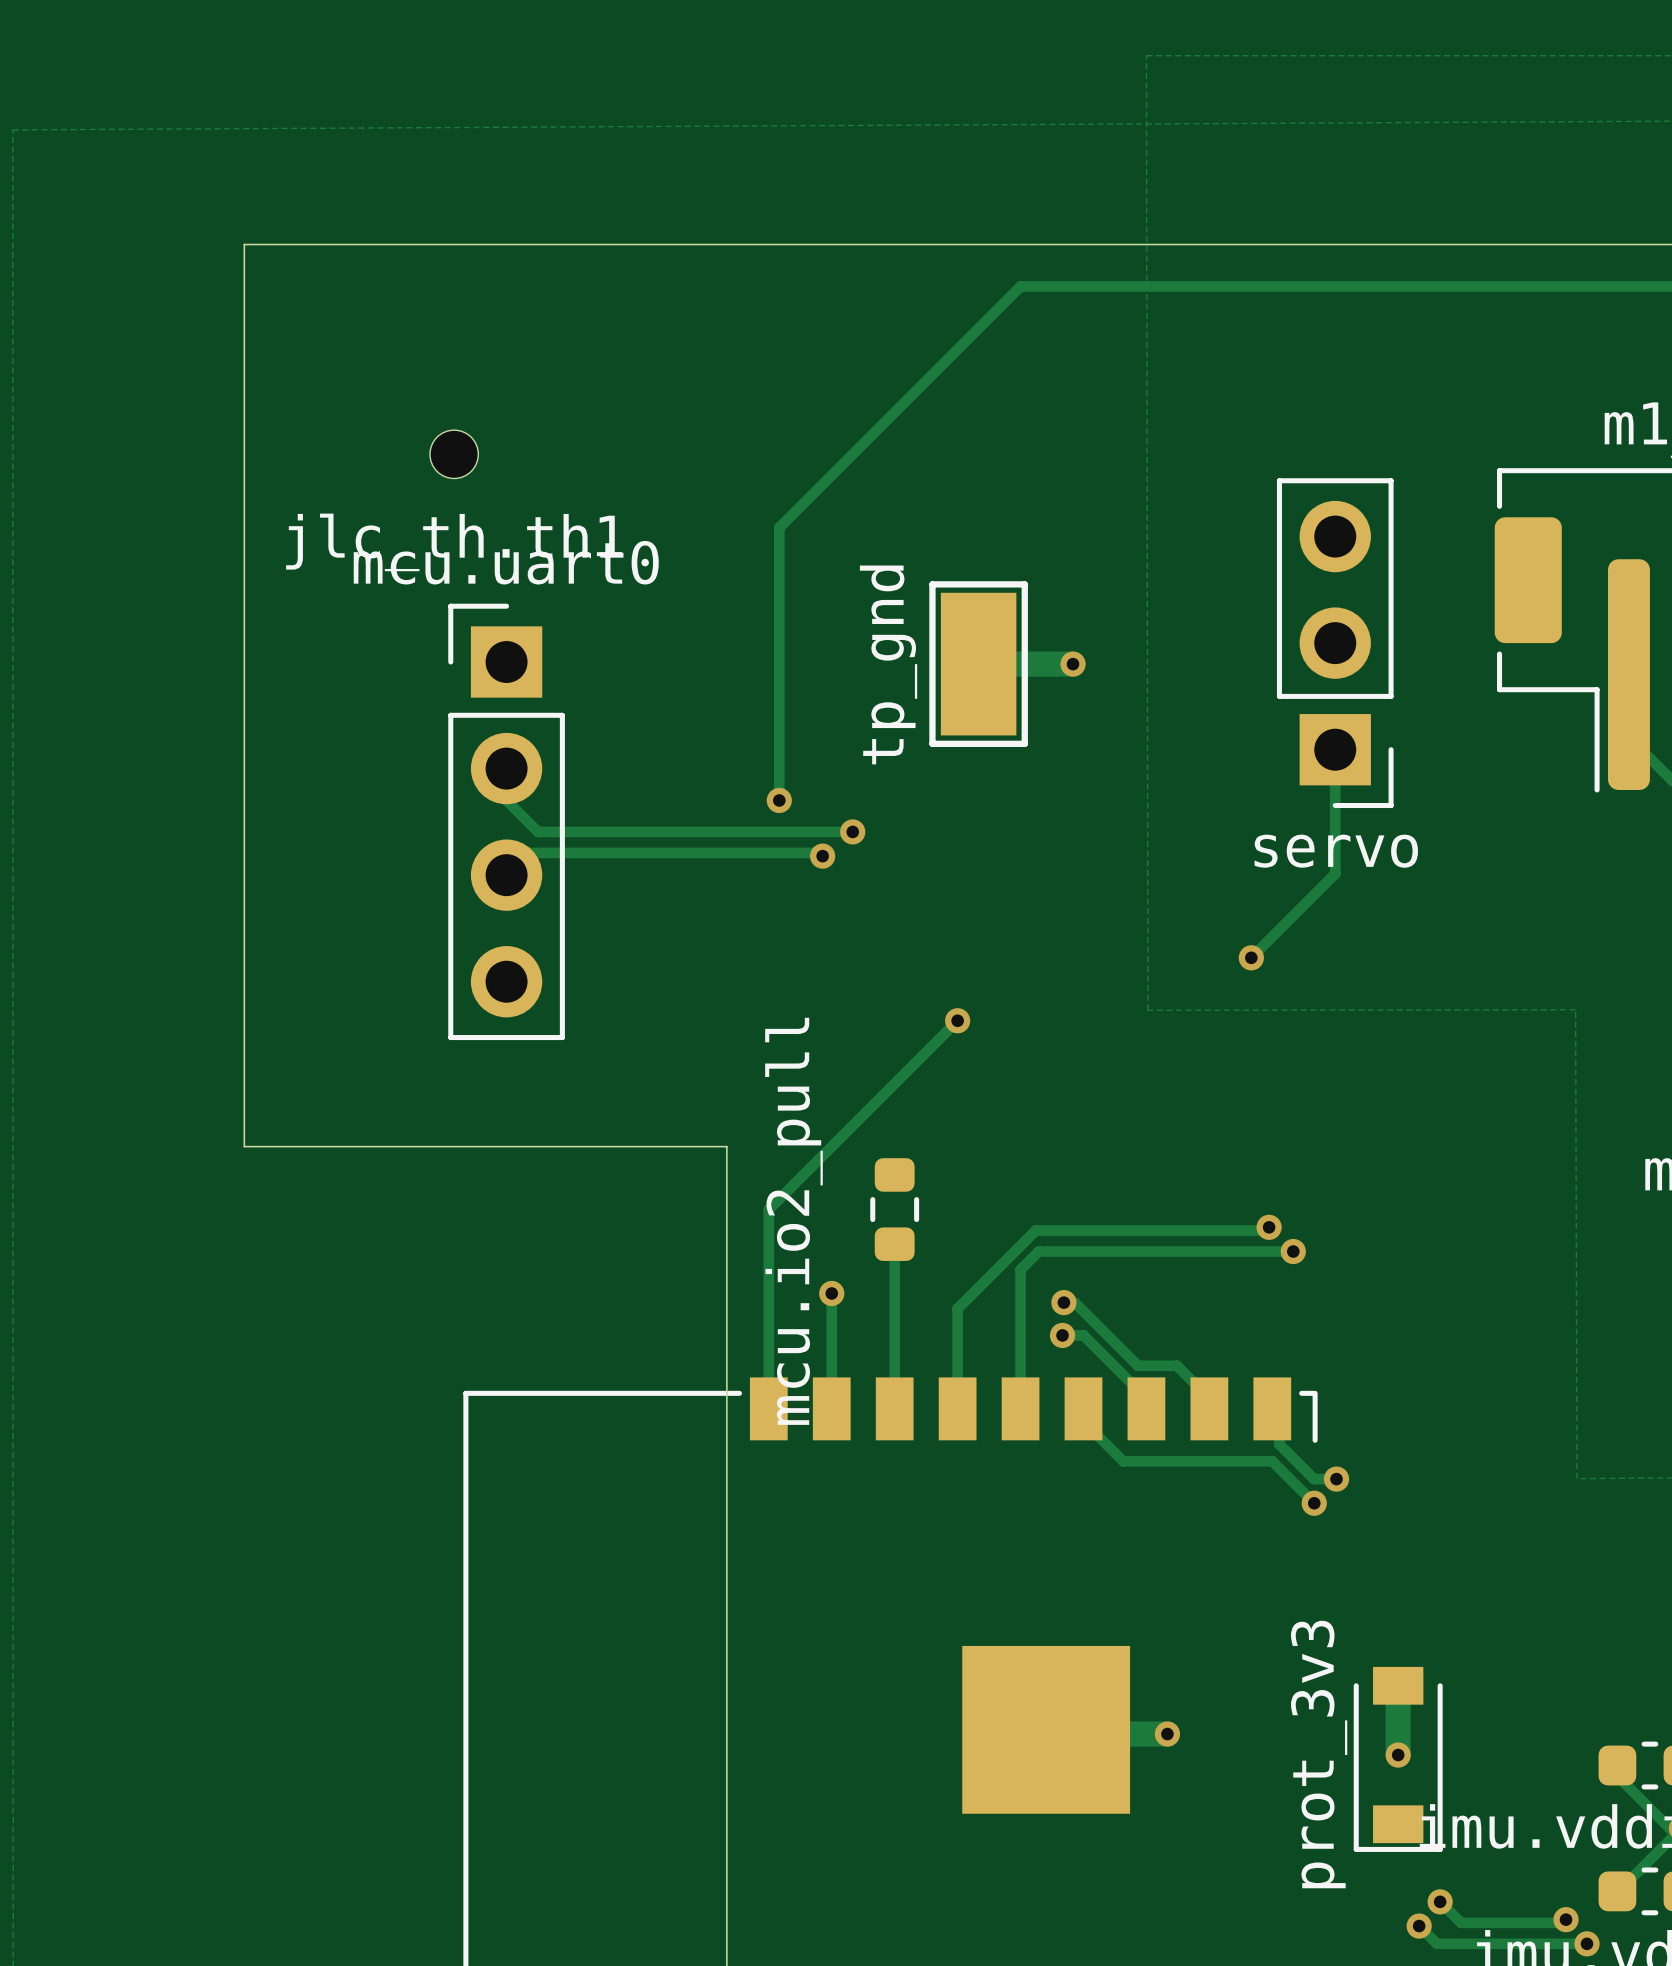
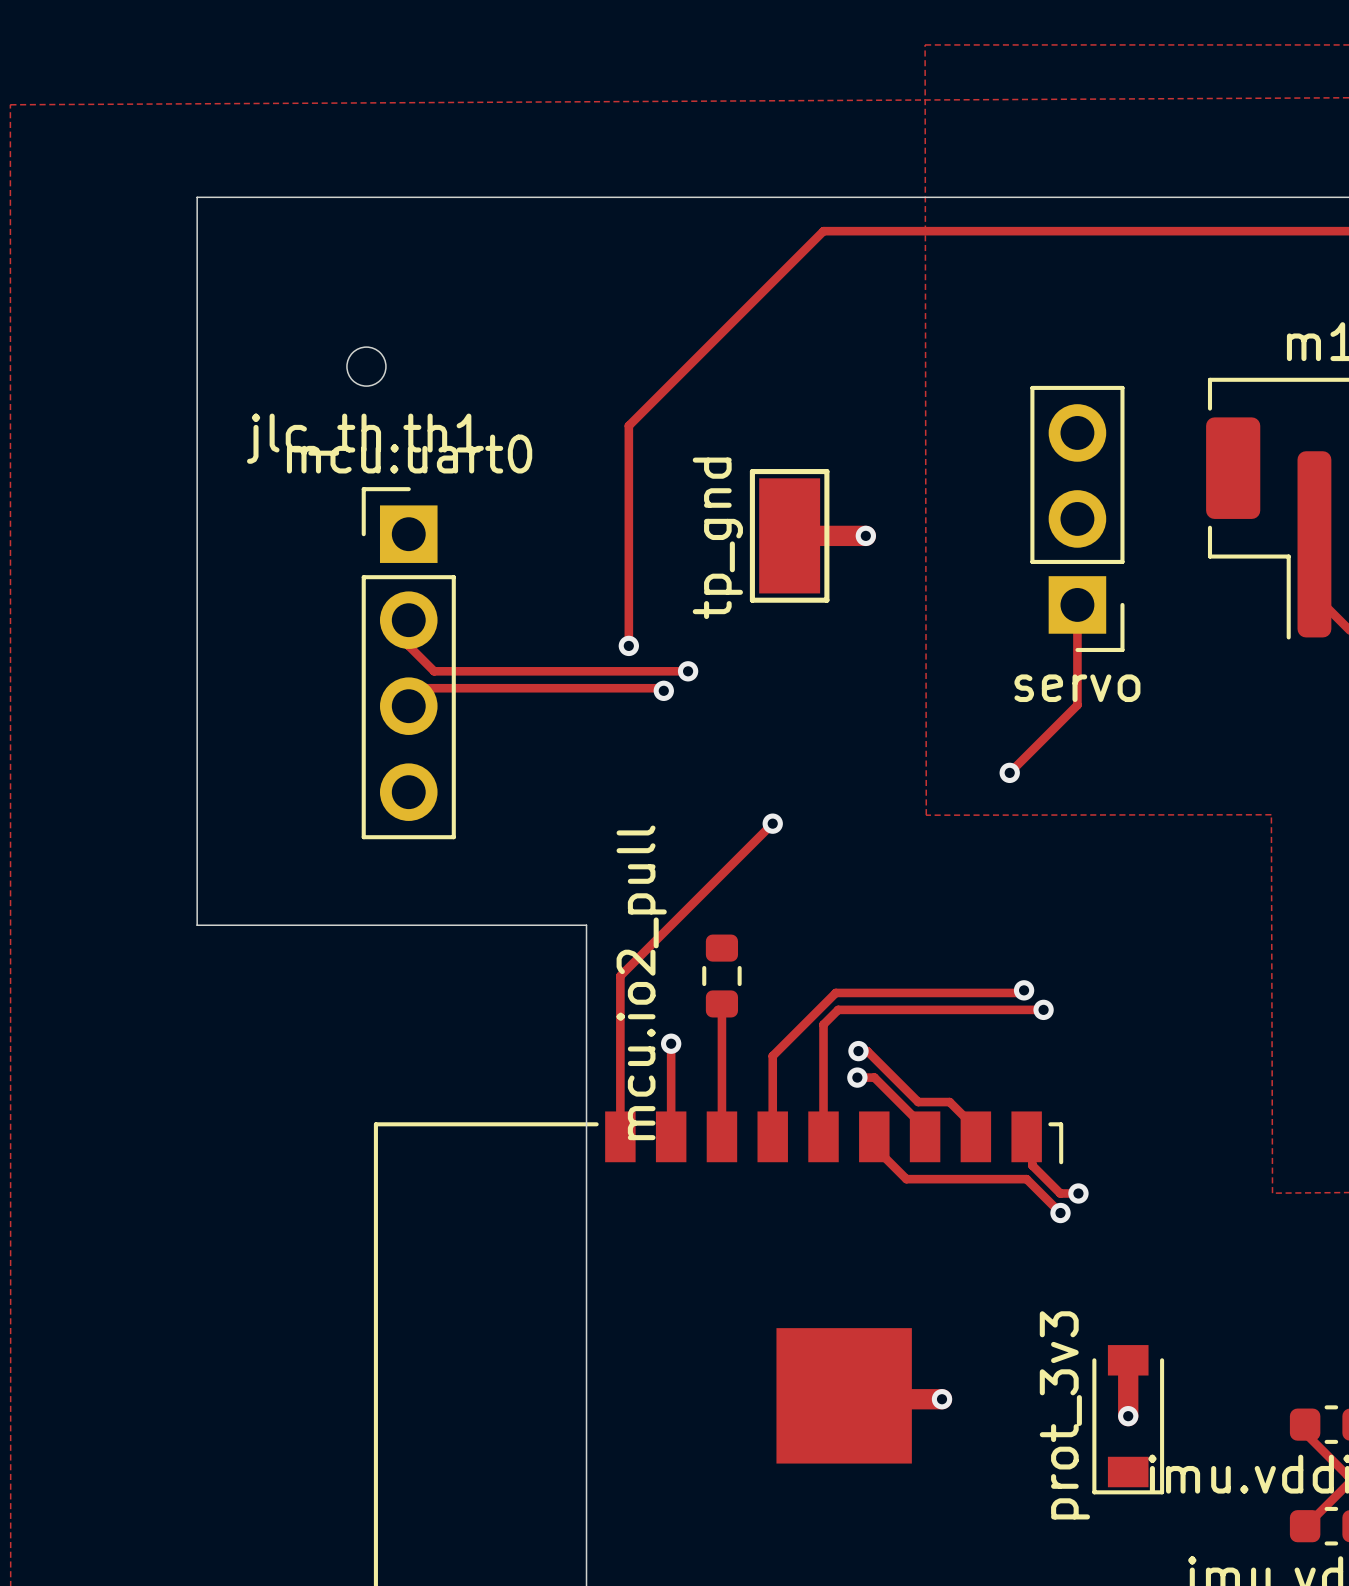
track: (1440, 1901) (1461, 1922) (1562, 1922) (1566, 1919) -> none
via: (1440, 1901) -> none
via: (1566, 1919) -> none
track: (1419, 1926) (1436, 1943) (1587, 1943) -> none
via: (1419, 1926) -> none
via: (1587, 1943) -> none

